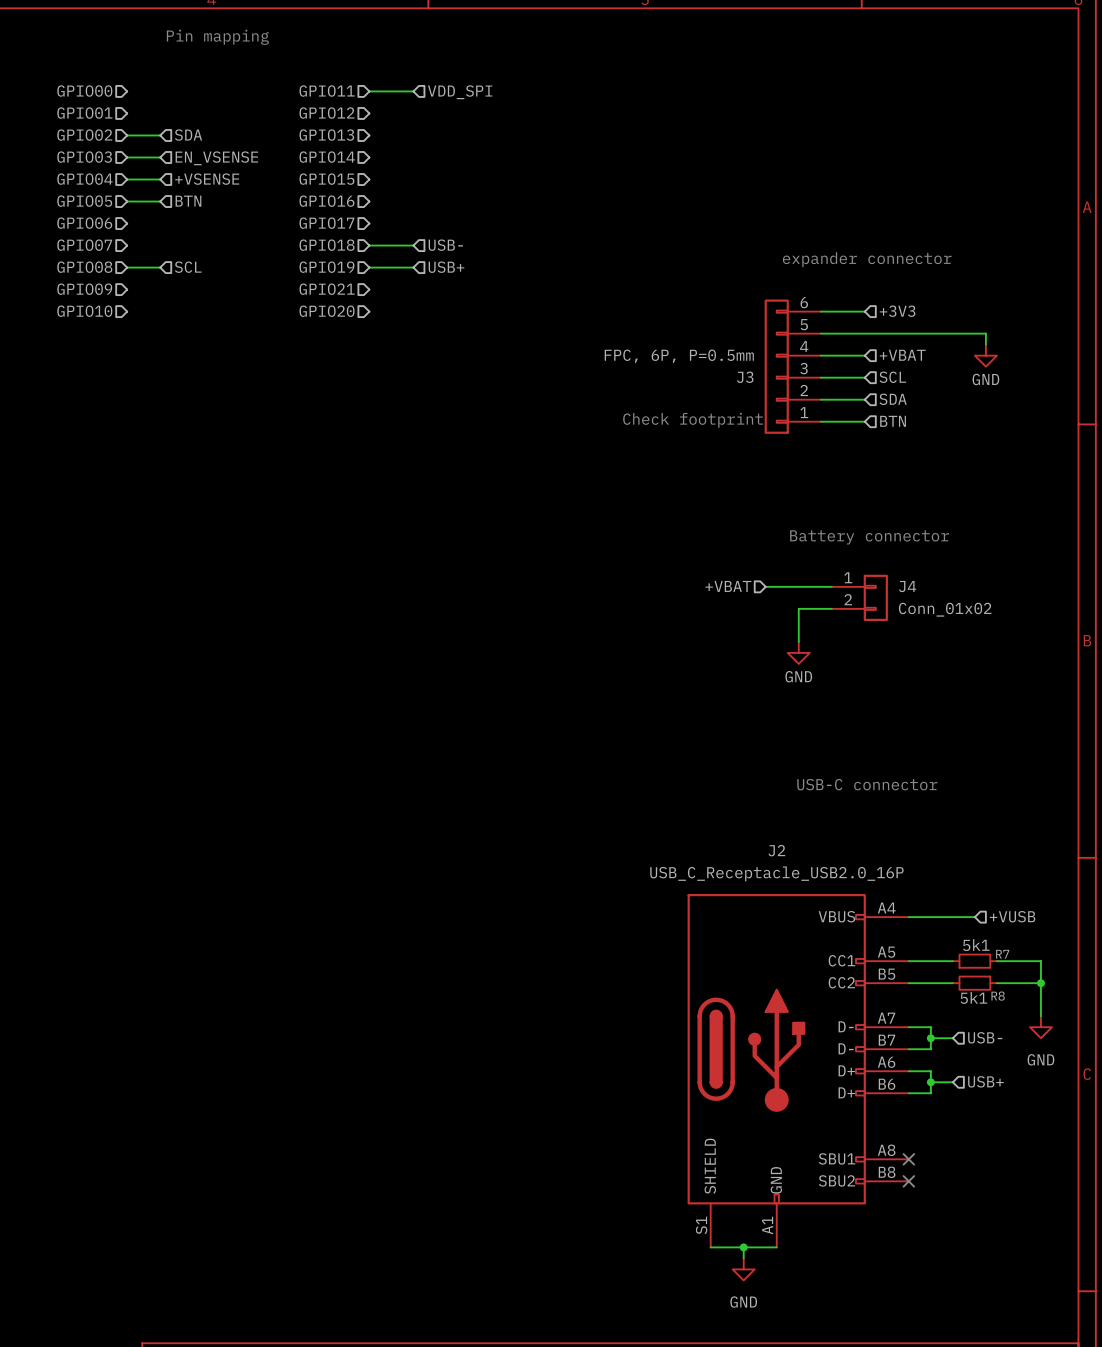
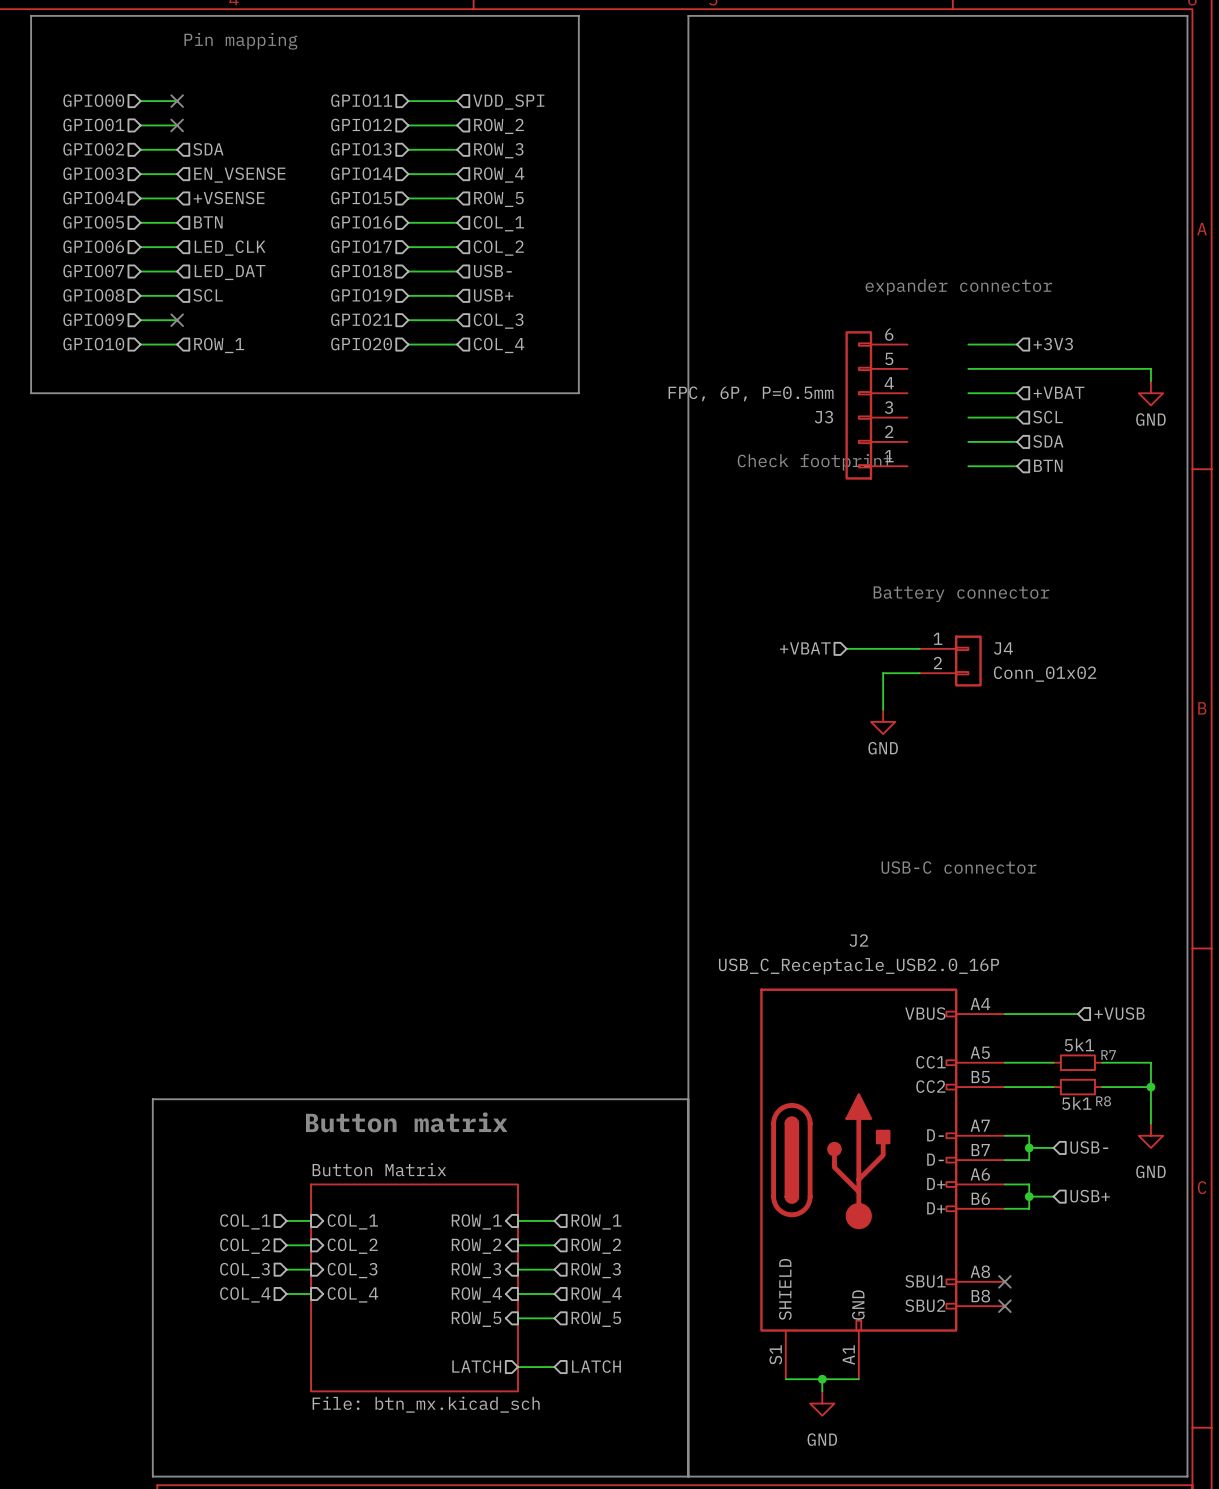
line: none -> (31, 15) (578, 15) (578, 393) (31, 393) (31, 15)
wire: none -> (140, 101) (177, 101)
no-connect mark: none -> (177, 101)
wire: none -> (140, 125) (177, 125)
no-connect mark: none -> (177, 125)
wire: none -> (408, 125) (457, 125)
hierarchical label: none -> ROW_2 (498, 126)
wire: none -> (408, 149) (457, 149)
hierarchical label: none -> ROW_3 (498, 150)
wire: none -> (408, 174) (457, 174)
hierarchical label: none -> ROW_4 (499, 175)
wire: none -> (408, 198) (457, 198)
hierarchical label: none -> ROW_5 (498, 199)
wire: none -> (408, 222) (457, 222)
hierarchical label: none -> COL_1 (498, 223)
wire: none -> (140, 247) (177, 247)
wire: none -> (408, 247) (457, 247)
hierarchical label: none -> LED_CLK (230, 248)
hierarchical label: none -> COL_2 (498, 248)
wire: none -> (140, 271) (177, 271)
hierarchical label: none -> LED_DAT (230, 272)
wire: none -> (140, 320) (177, 320)
no-connect mark: none -> (177, 320)
wire: none -> (408, 320) (457, 320)
hierarchical label: none -> COL_3 (498, 321)
wire: none -> (140, 344) (177, 344)
wire: none -> (408, 344) (457, 344)
wire: (820, 311) (864, 311) -> (968, 344) (1017, 344)
hierarchical label position: +3V3 (897, 311) -> +3V3 (1053, 344)
hierarchical label: none -> ROW_1 (219, 345)
hierarchical label: none -> COL_4 (499, 345)
wire: (820, 333) (875, 333) -> none
wire: (985, 333) (985, 344) -> (1090, 368) (1150, 368) (1150, 381)
wire: (820, 355) (864, 355) -> (968, 393) (1017, 393)
hierarchical label position: +VBAT (902, 355) -> +VBAT (1059, 392)
power symbol position: GND (985, 355) -> GND (1150, 393)
wire: (820, 377) (864, 377) -> (968, 417) (1017, 417)
hierarchical label position: SCL (892, 377) -> SCL (1048, 417)
wire: (820, 399) (864, 399) -> (968, 441) (1017, 441)
hierarchical label position: SDA (893, 399) -> SDA (1048, 441)
text position: Check footprint (693, 420) -> Check footprint (814, 462)
wire: (820, 421) (864, 421) -> (968, 466) (1017, 466)
hierarchical label position: BTN (893, 421) -> BTN (1048, 465)
line: none -> (688, 1099) (152, 1099) (152, 1476) (1187, 1476) (1187, 15) (688, 15) (688, 1476)
text: none -> Button matrix (406, 1122)
wire: none -> (286, 1220) (311, 1220)
wire: none -> (517, 1220) (554, 1220)
hierarchical label: none -> COL_1 (245, 1221)
sheet pin: none -> COL_1 (352, 1221)
sheet pin: none -> ROW_1 (476, 1221)
hierarchical label: none -> ROW_1 (596, 1221)
wire: none -> (286, 1245) (311, 1245)
wire: none -> (517, 1245) (554, 1245)
hierarchical label: none -> COL_2 (245, 1246)
sheet pin: none -> COL_2 (352, 1246)
sheet pin: none -> ROW_2 (476, 1246)
hierarchical label: none -> ROW_2 (596, 1246)
wire: none -> (286, 1269) (311, 1269)
wire: none -> (517, 1269) (554, 1269)
hierarchical label: none -> COL_3 (244, 1270)
sheet pin: none -> COL_3 (352, 1270)
sheet pin: none -> ROW_3 (476, 1270)
hierarchical label: none -> ROW_3 (596, 1270)
sheet Button Matrix: none -> File: btn_mx.kicad_sch (414, 1287)
wire: none -> (286, 1294) (311, 1294)
wire: none -> (517, 1294) (554, 1294)
hierarchical label: none -> COL_4 (245, 1294)
sheet pin: none -> COL_4 (352, 1294)
sheet pin: none -> ROW_4 (476, 1294)
hierarchical label: none -> ROW_4 (596, 1294)
wire: none -> (517, 1318) (554, 1318)
sheet pin: none -> ROW_5 (476, 1319)
hierarchical label: none -> ROW_5 (596, 1319)
sheet pin: none -> LATCH (476, 1366)
hierarchical label: none -> LATCH (596, 1366)
wire: none -> (517, 1367) (554, 1367)

